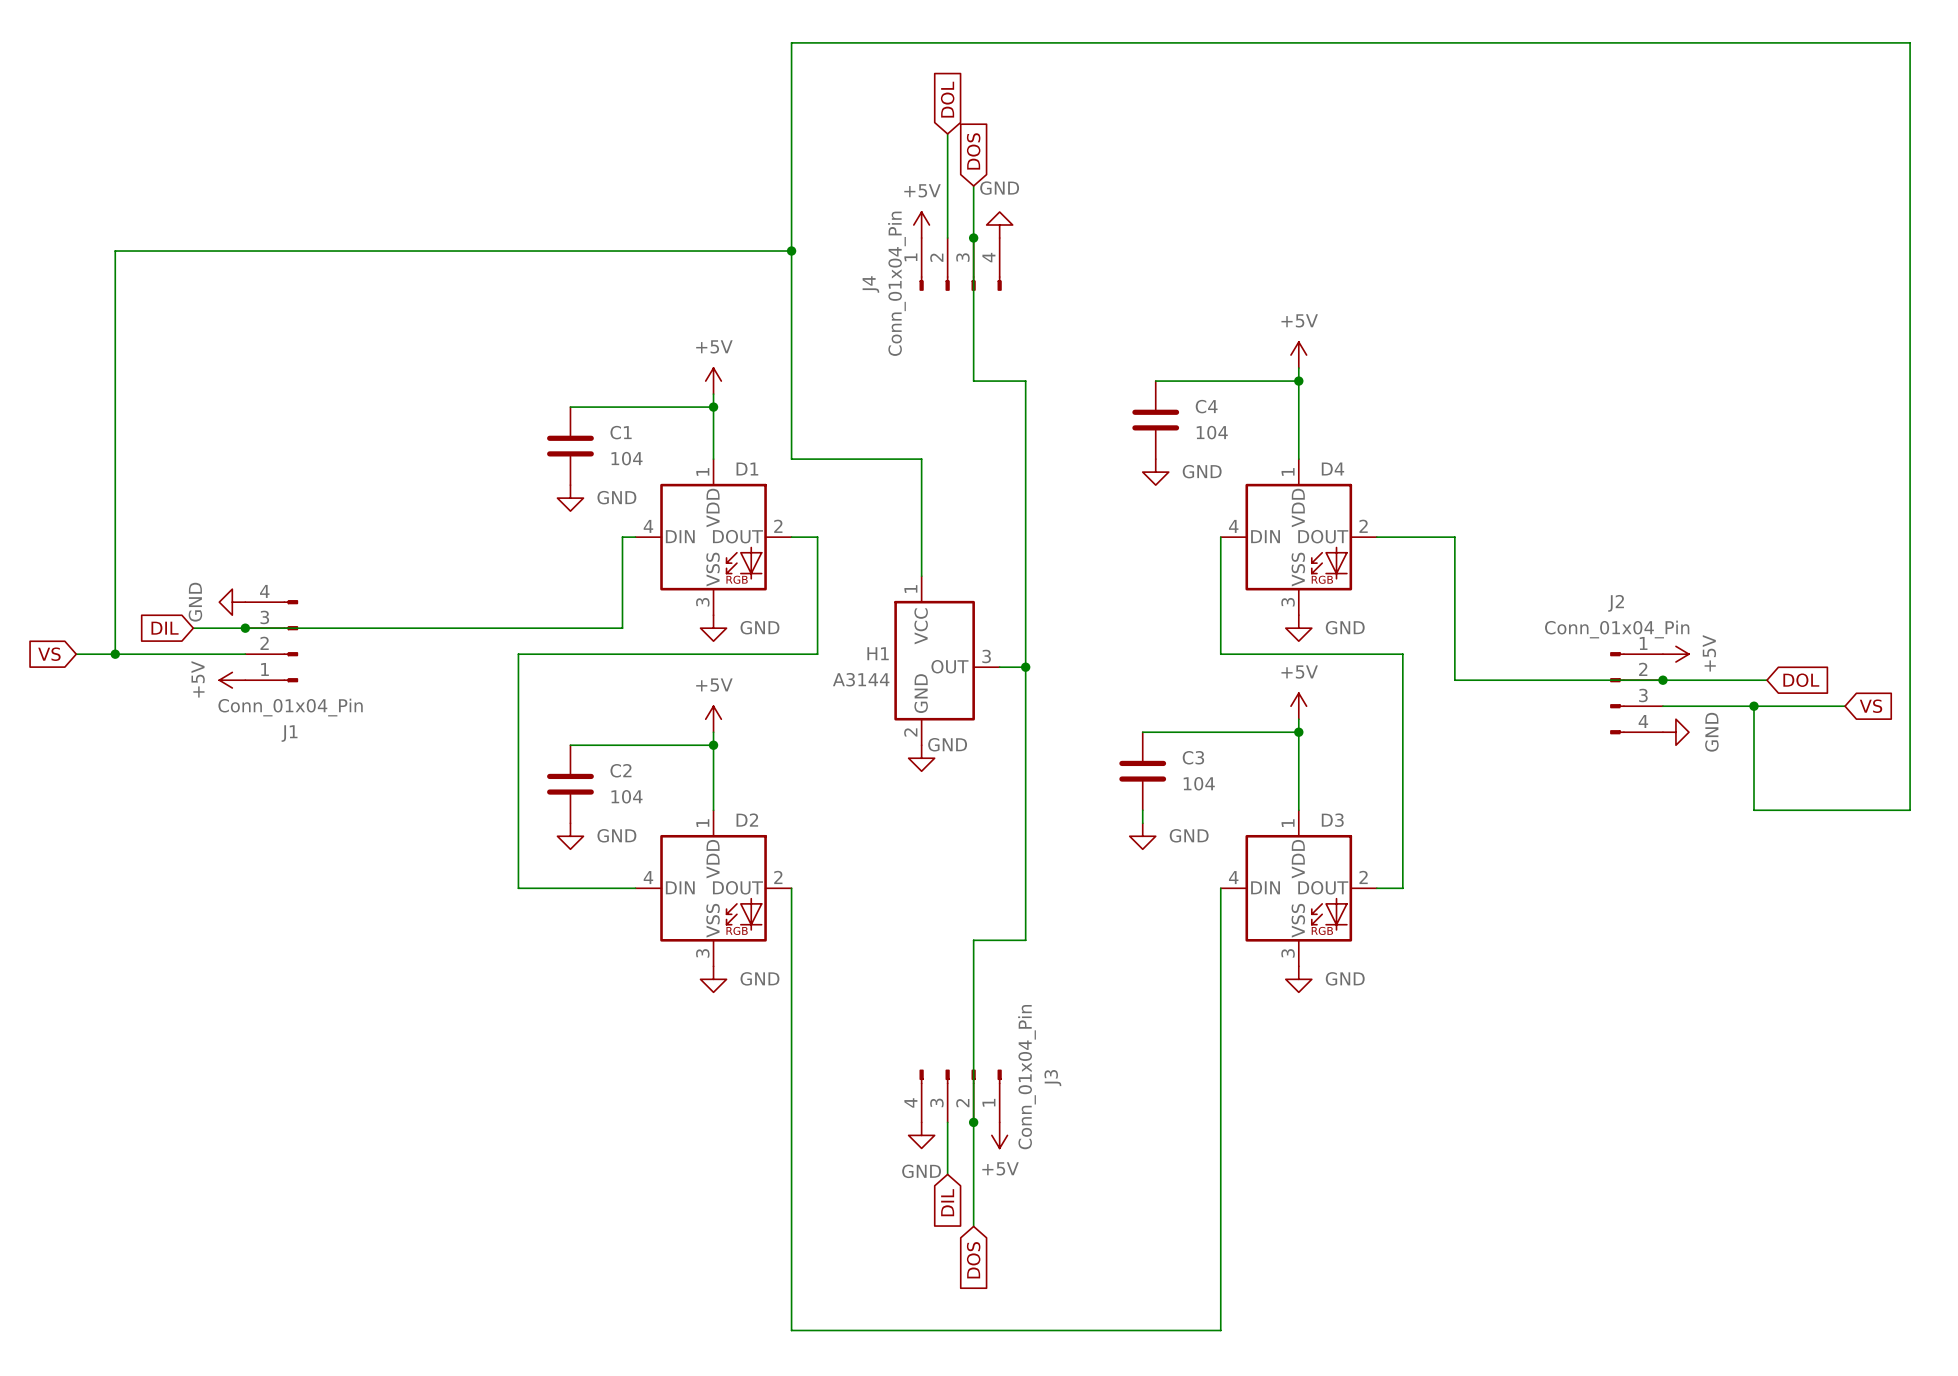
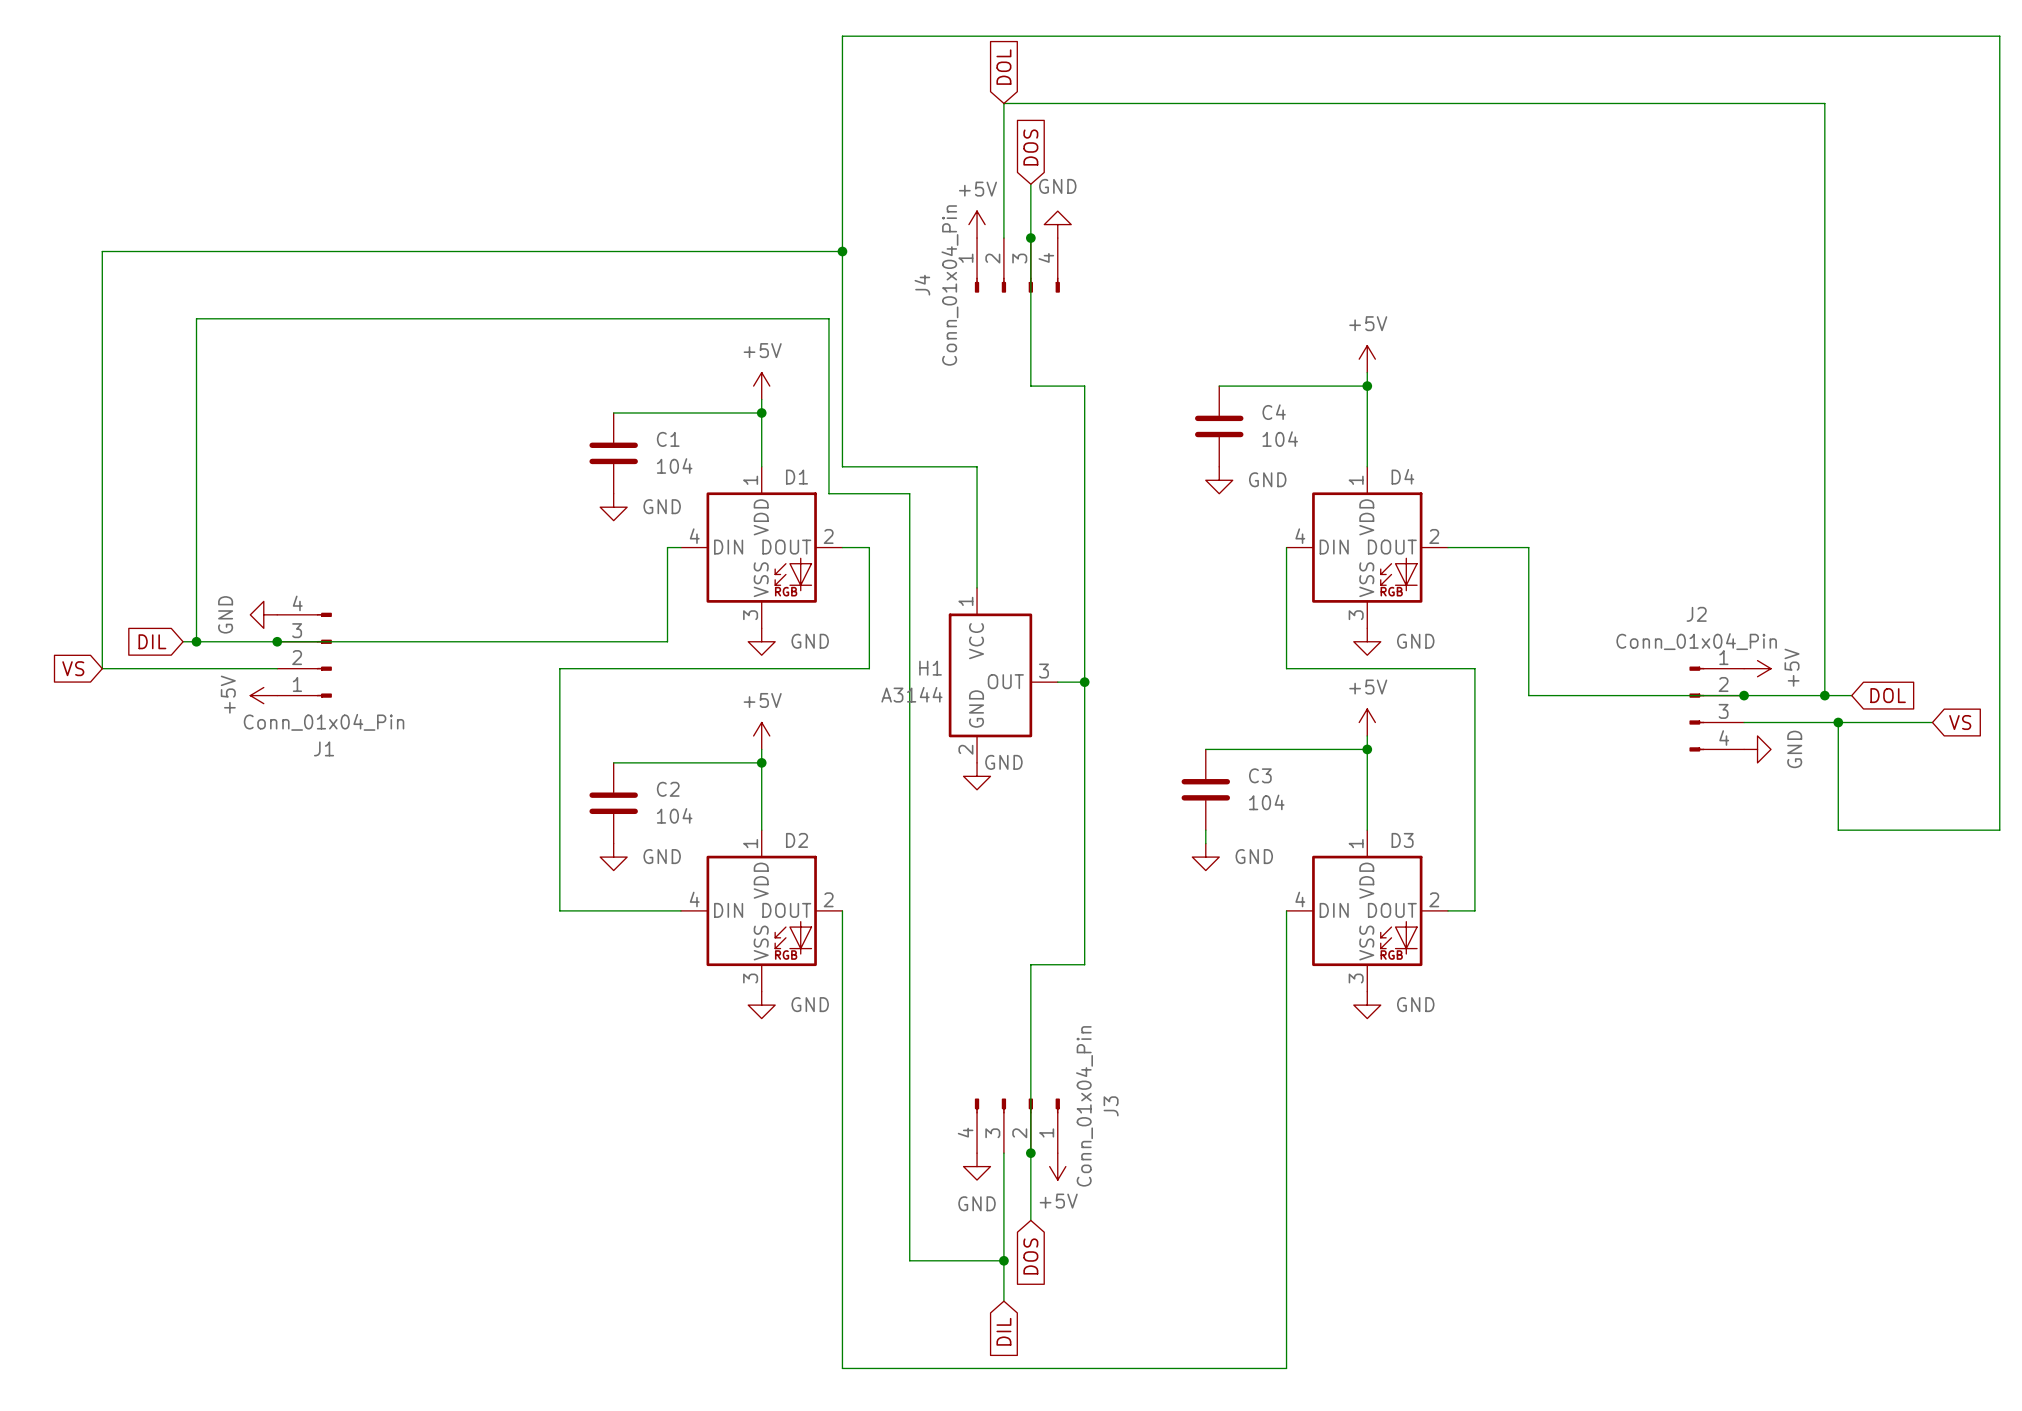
global label position: DOL (947, 99) -> DOL (1003, 67)
wire: none -> (1003, 130) (1003, 103) (1824, 103) (1824, 695)
wire: (115, 251) (115, 654) -> (142, 251) (102, 251) (102, 668)
wire: none -> (183, 641) (223, 641)
global label position: DIL (165, 628) -> DIL (152, 641)
wire: none -> (196, 641) (196, 318) (828, 318) (828, 493) (909, 493) (909, 1260) (1003, 1260)
junction position: (115, 654) -> (196, 641)
junction: none -> (1824, 695)
wire: none -> (1003, 1206) (1003, 1301)
wire: (973, 1187) (973, 1226) -> none
global label position: DIL (947, 1202) -> DIL (1003, 1331)
junction: none -> (1003, 1260)
global label position: DOS (973, 1260) -> DOS (1030, 1256)

